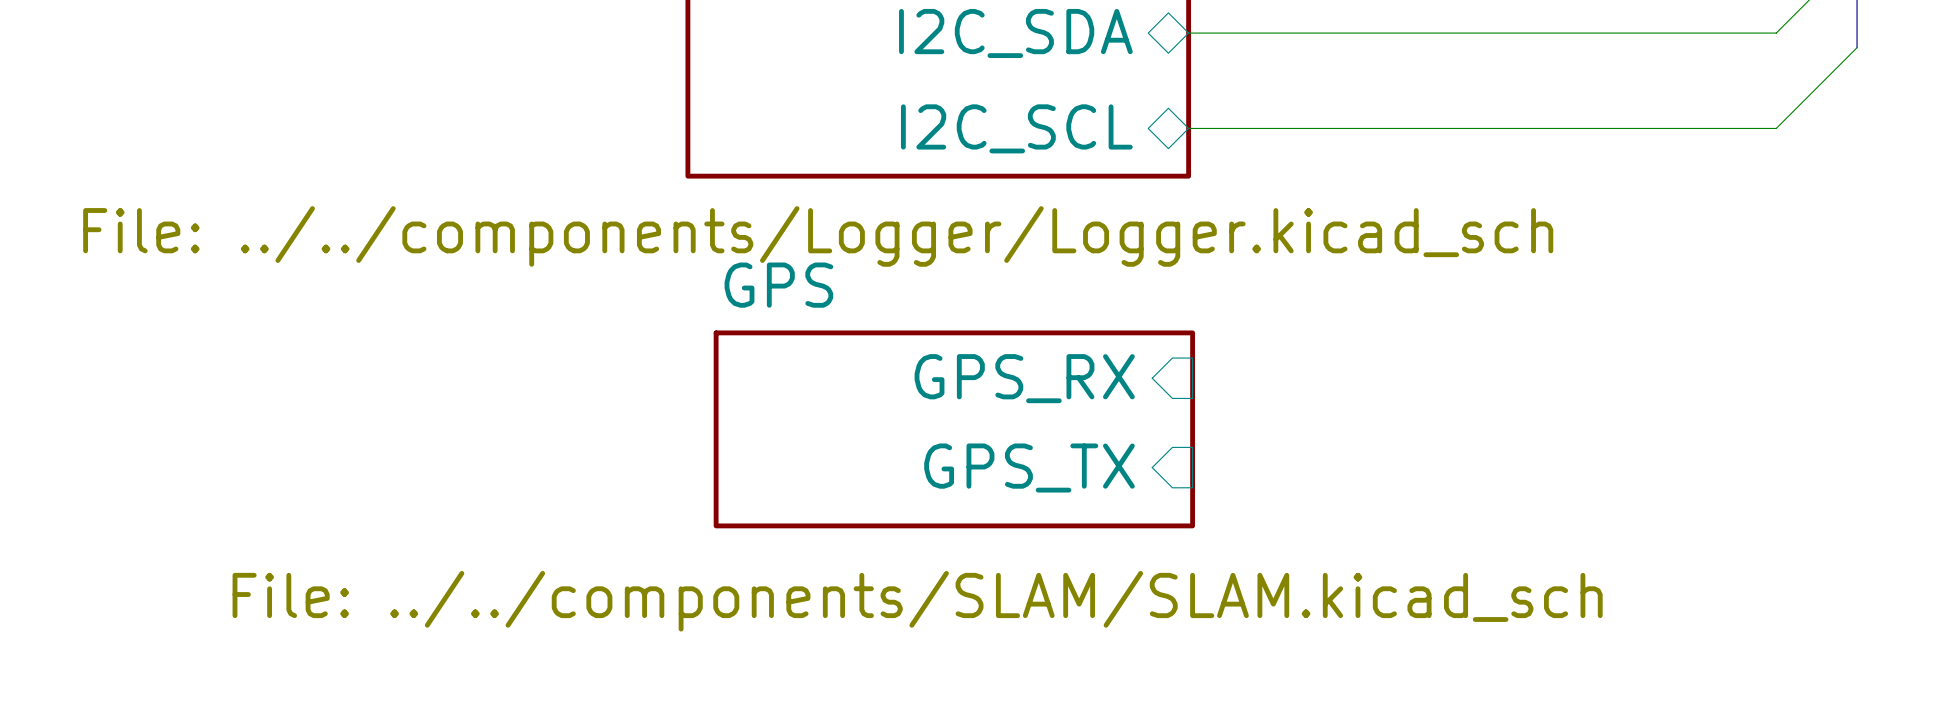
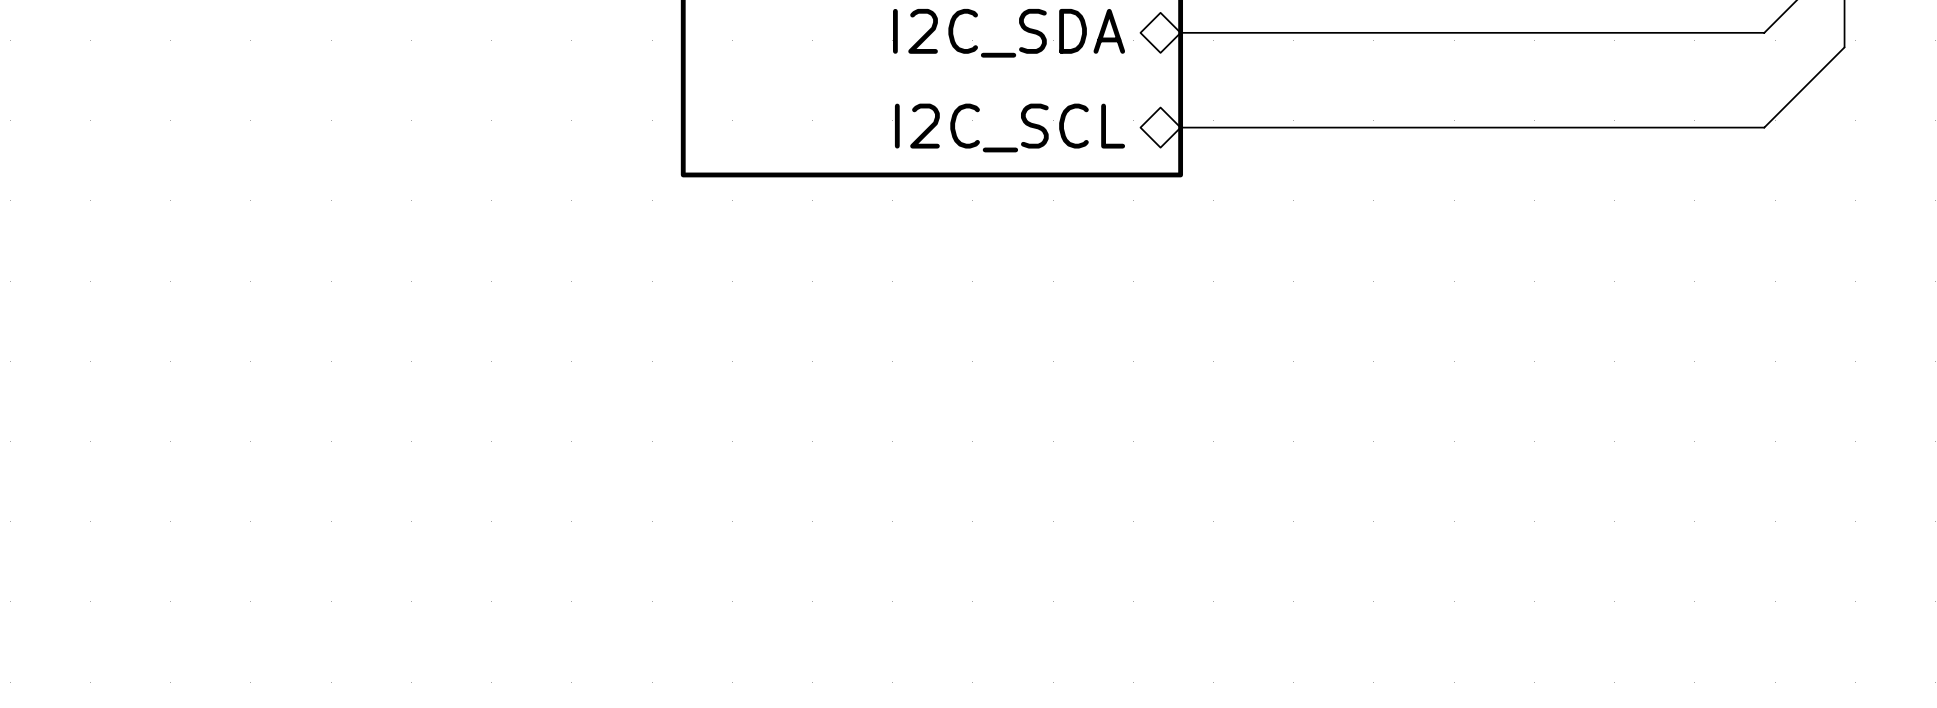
sheet value: File: ../../components/Logger/Logger.kicad_sch (818, 236) -> none
sheet pin: GPS_RX (1024, 378) -> none
sheet GPS: File: ../../components/SLAM/SLAM.kicad_sch (954, 429) -> none
sheet pin: GPS_TX (1029, 468) -> none

